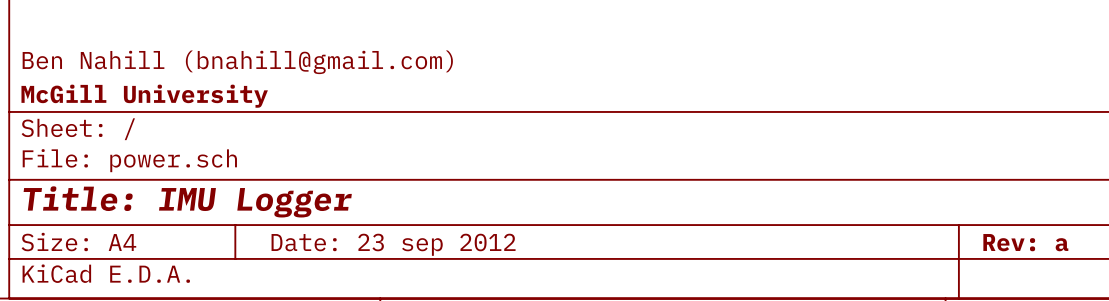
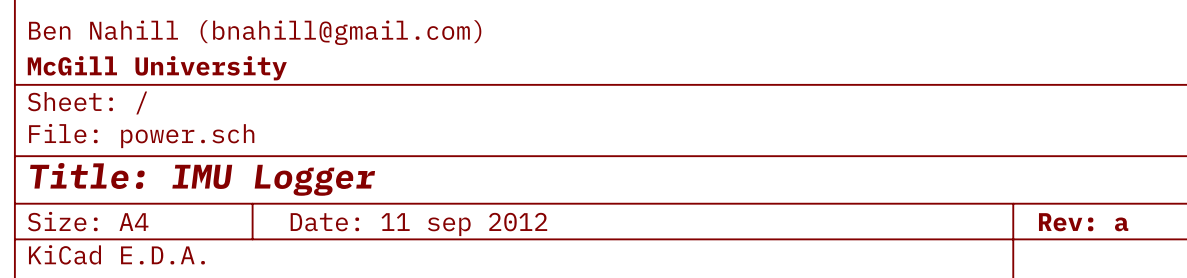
title block: Date: 23 sep 2012 (393, 244) -> Date: 11 sep 2012 (418, 224)

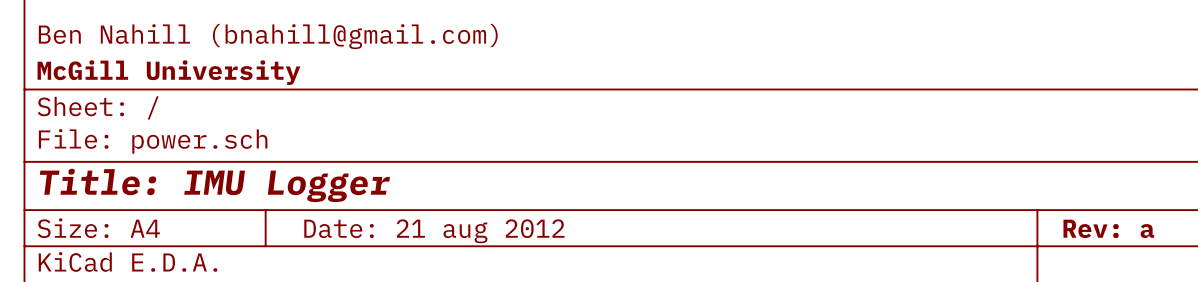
title block: Date: 11 sep 2012 (418, 224) -> Date: 21 aug 2012 (434, 231)

